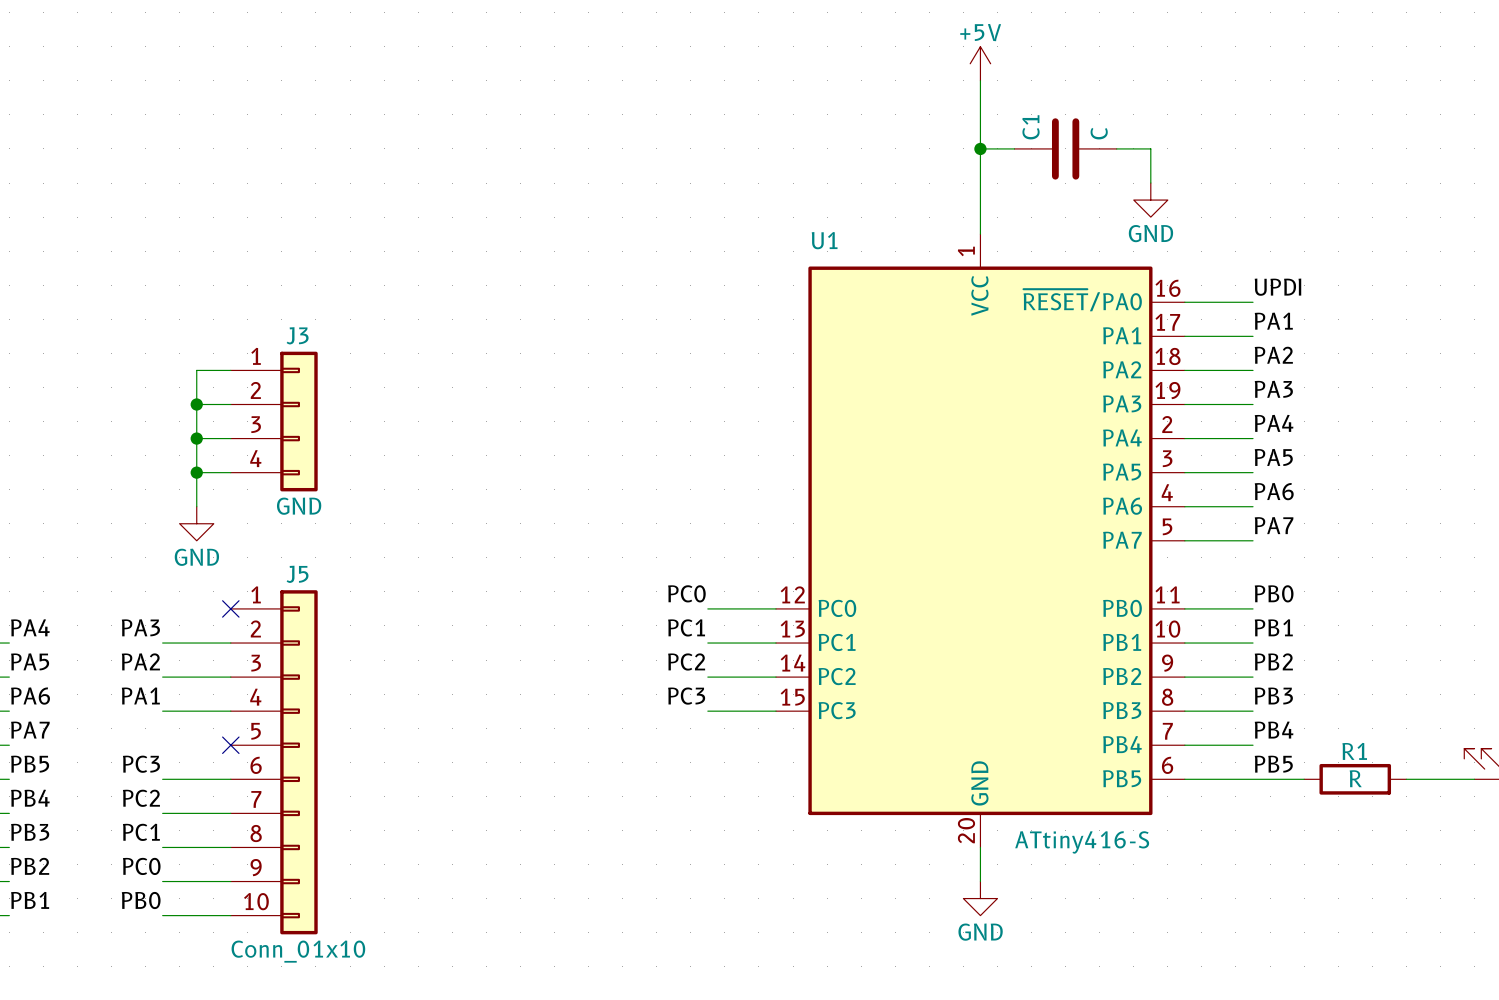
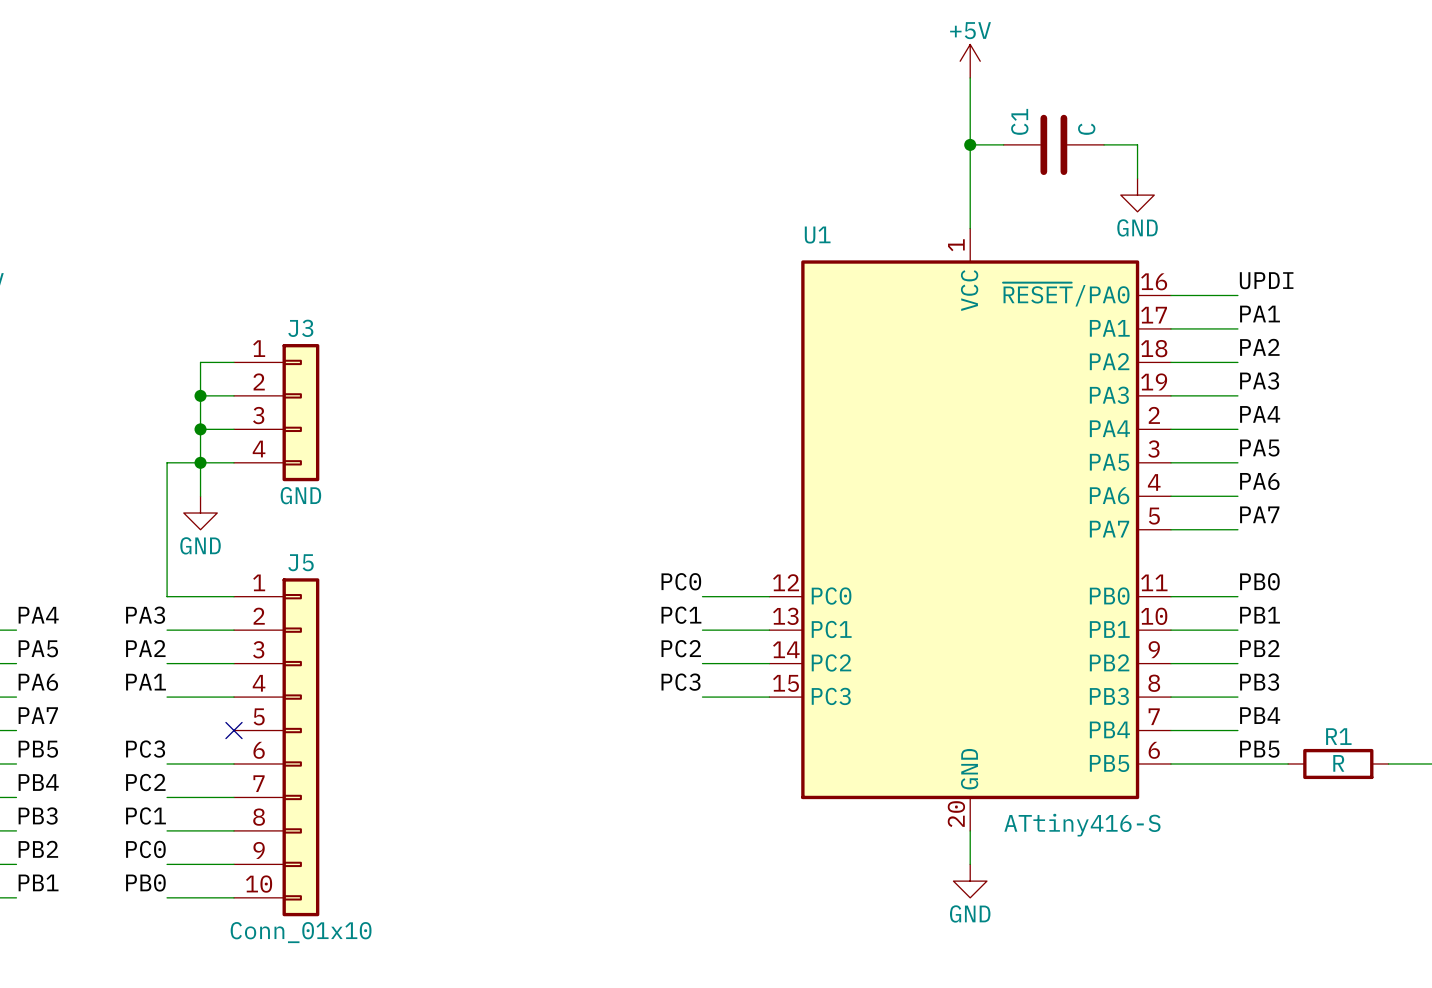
wire: none -> (200, 462) (167, 462) (167, 596) (233, 596)
no-connect mark: (230, 608) -> none

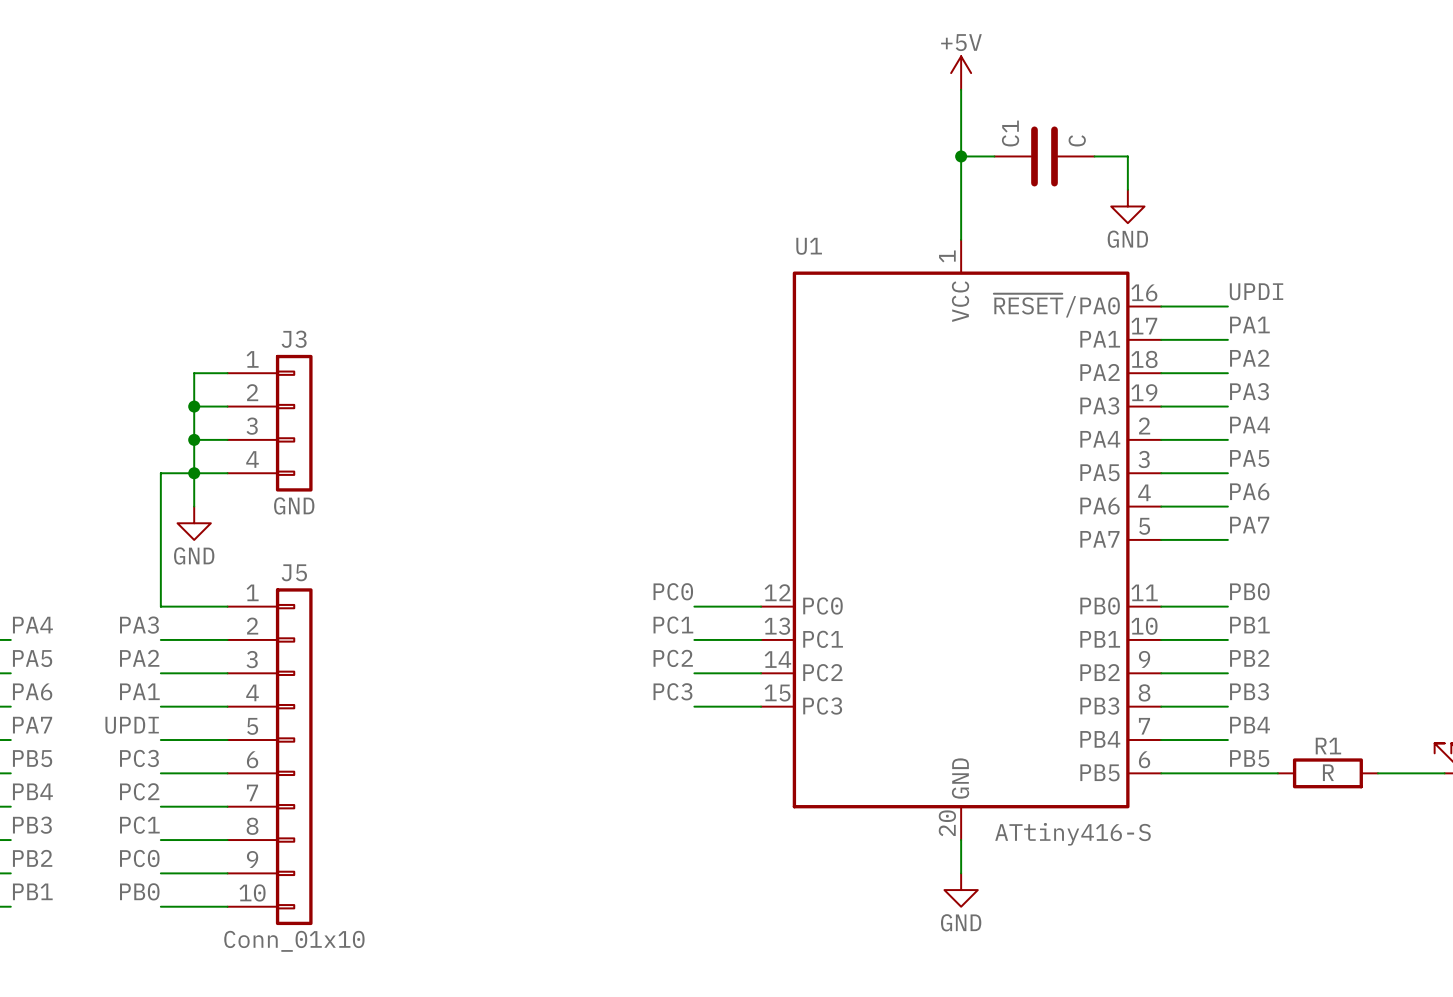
label: none -> UPDI (132, 725)
wire: none -> (160, 740) (227, 740)
no-connect mark: (233, 730) -> none

